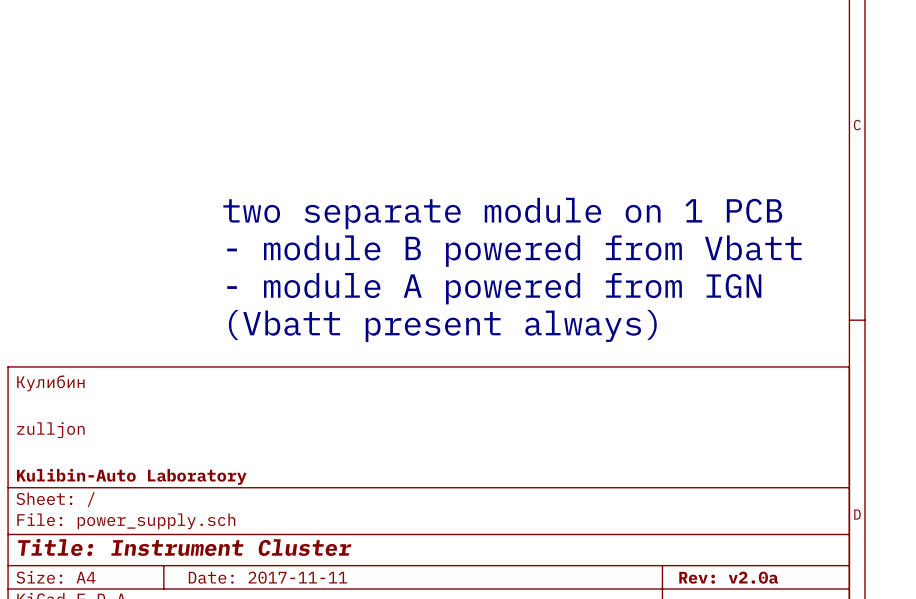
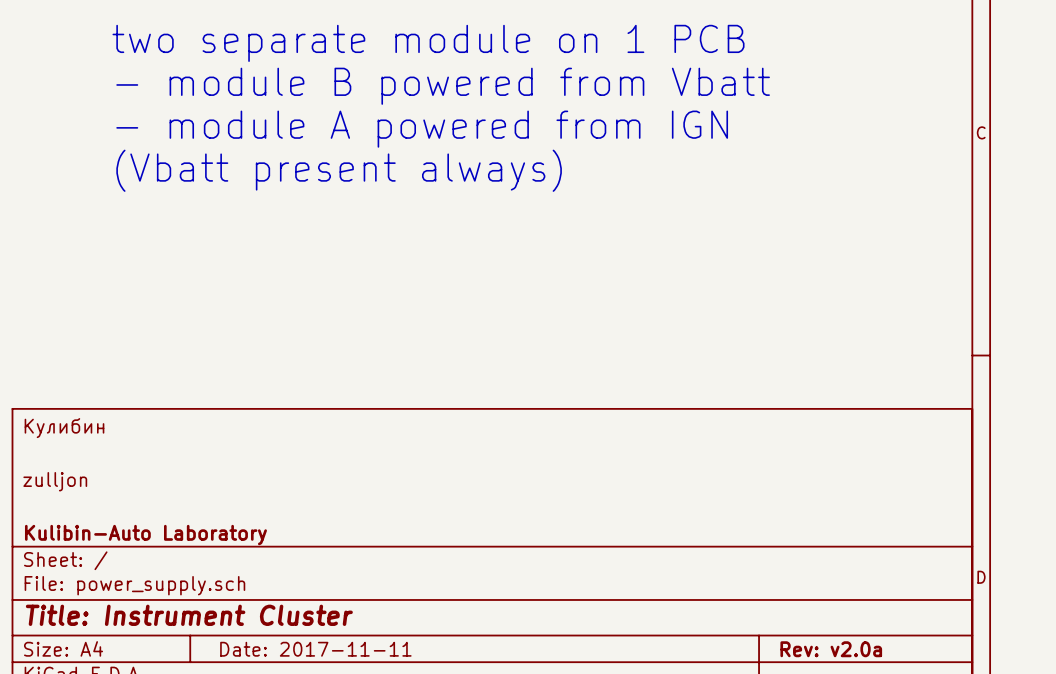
text: none -> two separate module on 1 PCB (428, 43)
text: none -> - module B powered from Vbatt (443, 86)
text: none -> - module A powered from IGN (422, 129)
text: none -> (Vbatt present always) (339, 170)
text: two separate module on 1 PCB (502, 213) -> none
text: - module B powered from Vbatt (514, 251) -> none
text: - module A powered from IGN (494, 288) -> none
text: (Vbatt present always) (442, 325) -> none

